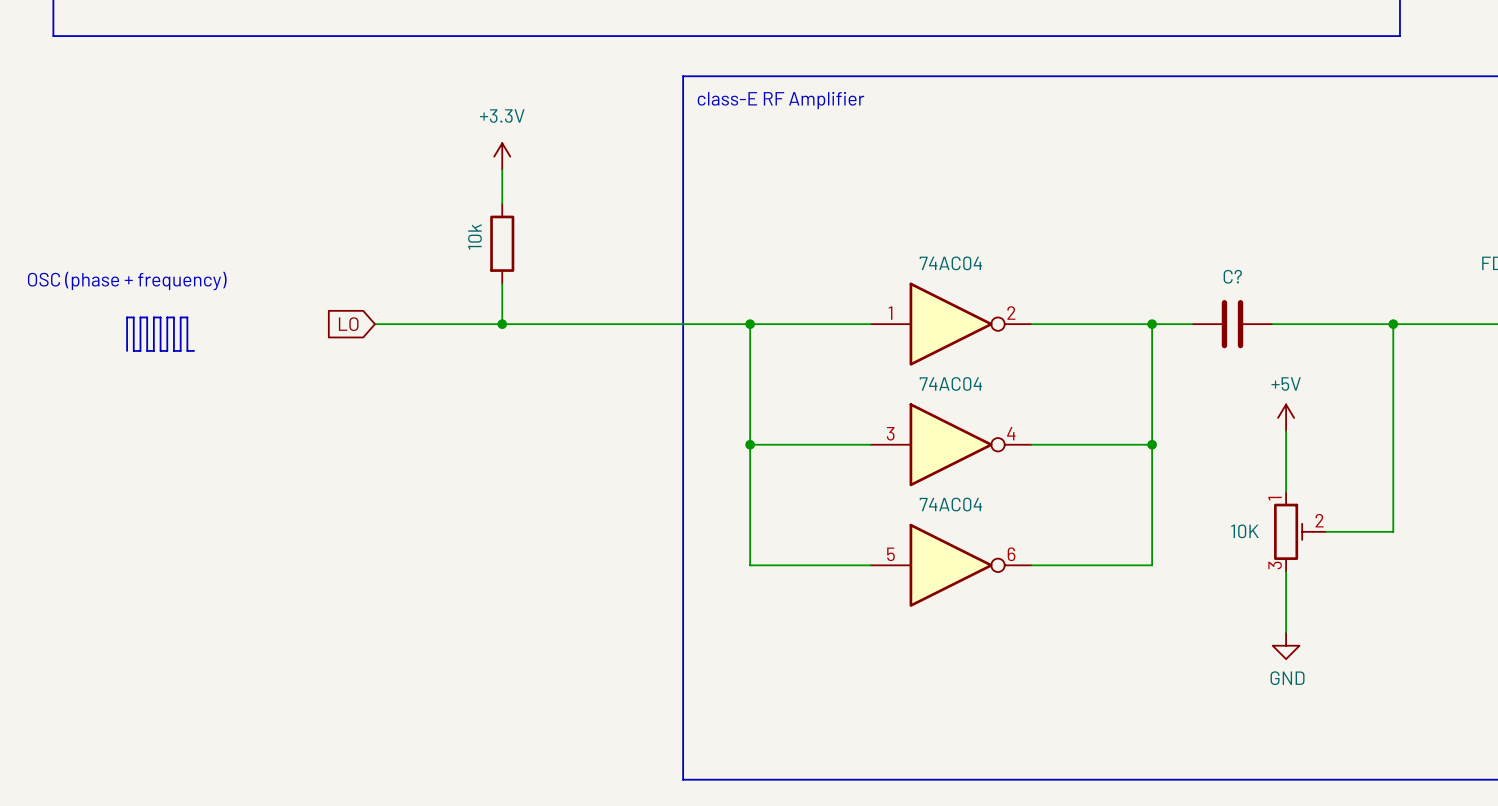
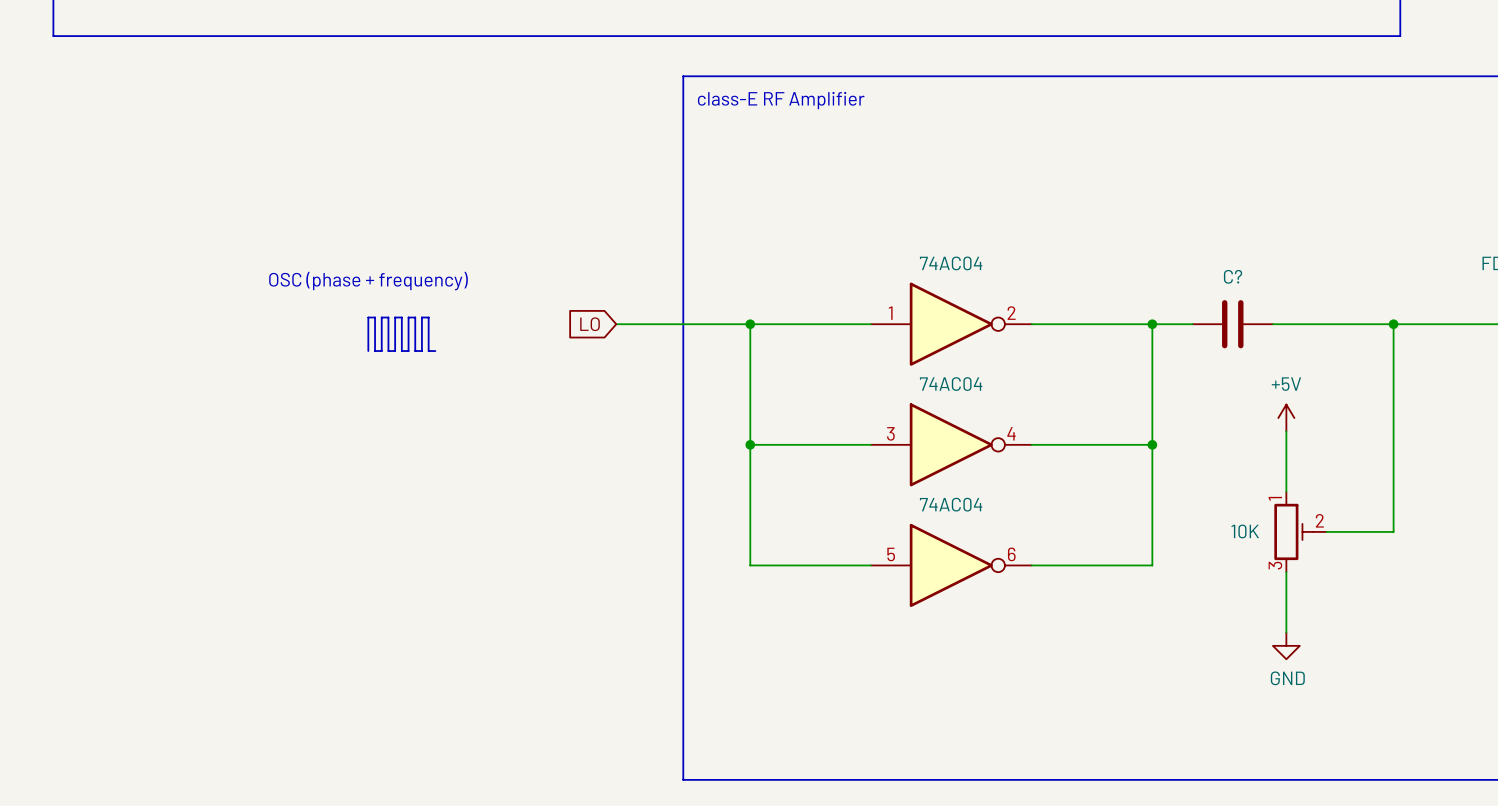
power symbol: +3.3V (502, 156) -> none
wire: (502, 170) (502, 203) -> none
part: 10k (502, 243) -> none
text position: OSC (phase + frequency) (127, 280) -> OSC (phase + frequency) (368, 281)
wire: (502, 283) (502, 324) -> none
global label position: LO (348, 324) -> LO (590, 324)
wire: (374, 324) (616, 324) -> none
junction: (502, 324) -> none
line: (127, 350) (127, 317) (133, 317) (133, 350) (140, 350) (140, 317) (147, 317) (147, 350) (153, 350) (153, 317) (160, 317) (160, 350) (167, 350) (167, 317) (173, 317) (173, 350) (180, 350) (180, 317) (187, 317) (187, 350) (194, 350) -> (368, 351) (368, 317) (375, 317) (375, 351) (381, 351) (381, 317) (388, 317) (388, 351) (395, 351) (395, 317) (401, 317) (401, 351) (408, 351) (408, 317) (415, 317) (415, 351) (421, 351) (421, 317) (428, 317) (428, 351) (435, 351)

